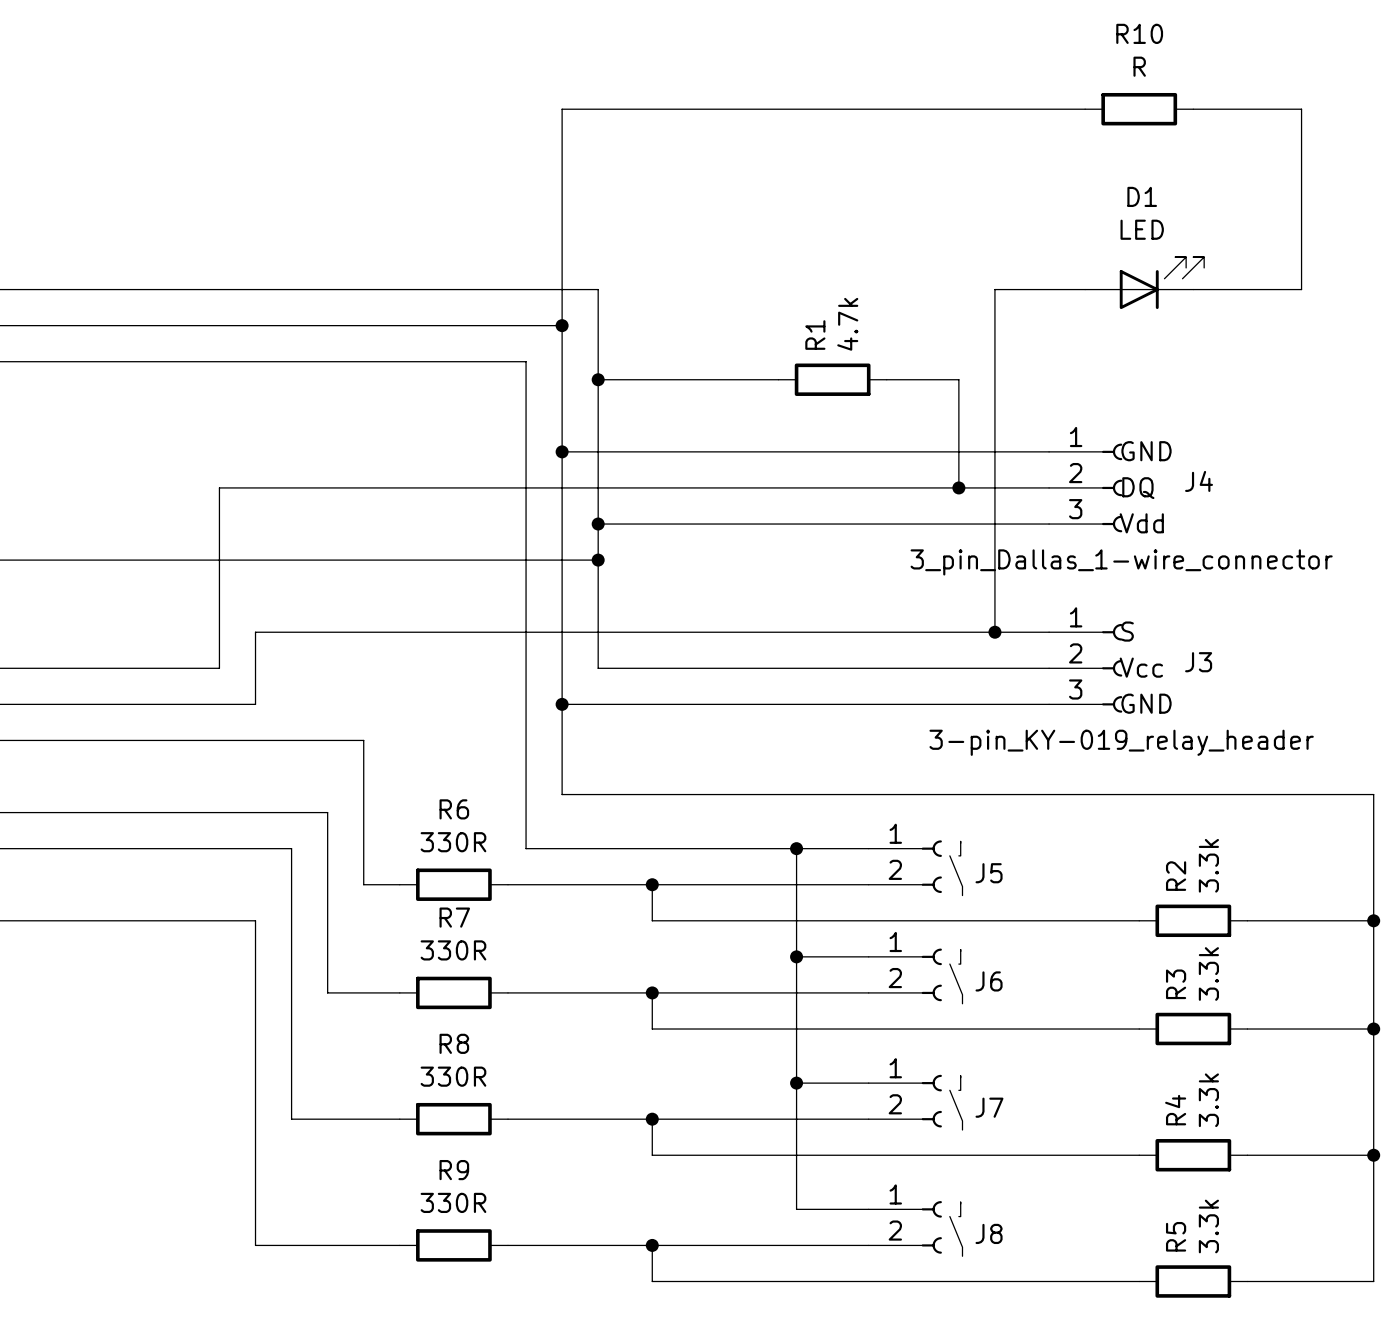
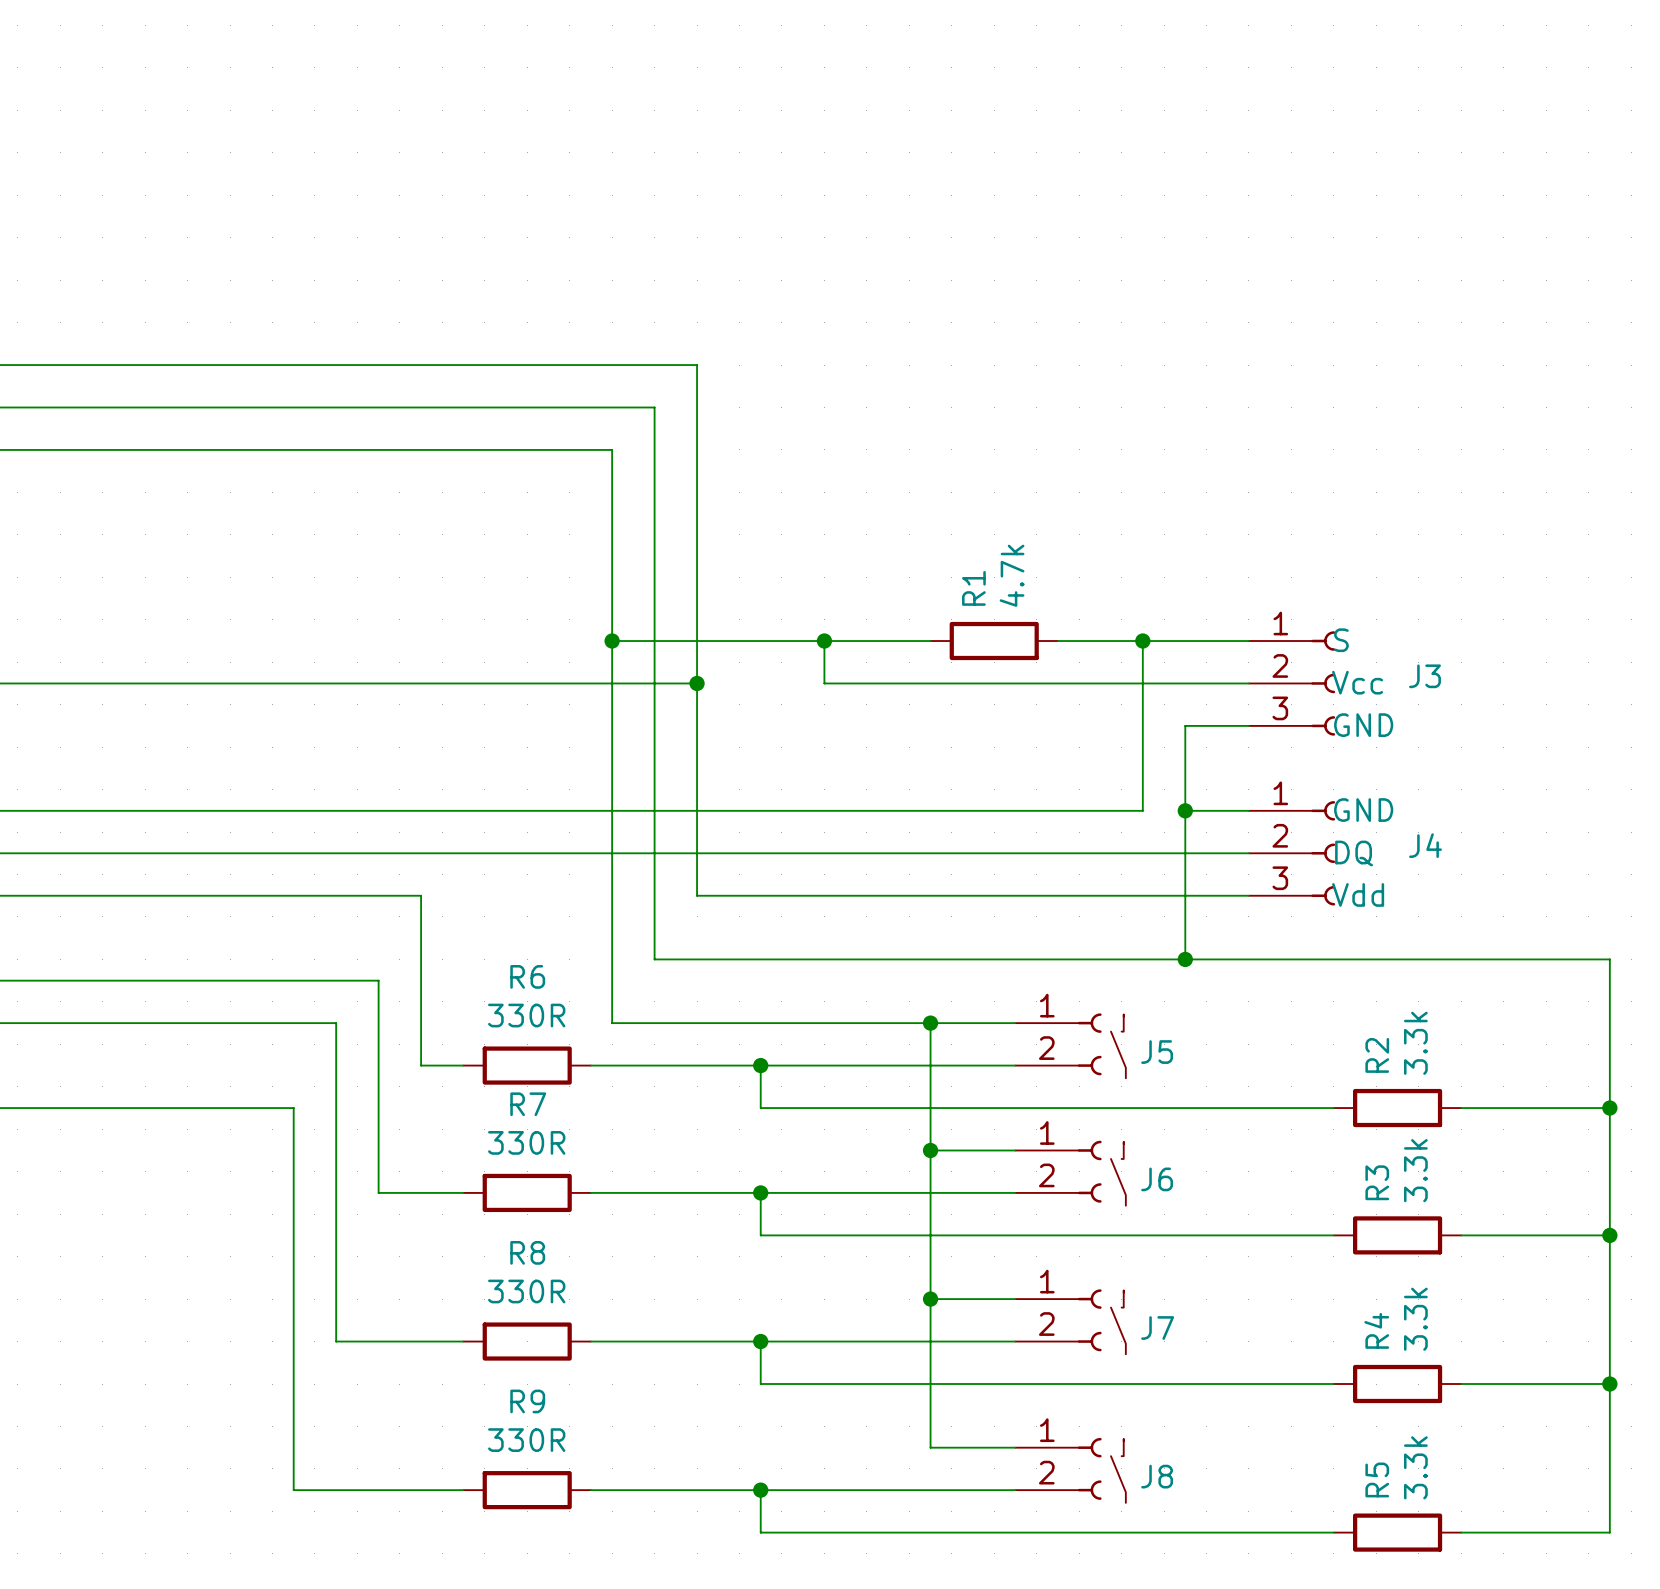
wire: (1085, 109) (562, 109) (562, 325) -> none
R10: R (1139, 109) -> none
wire: (1193, 109) (1301, 109) (1301, 289) (1193, 289) -> none
D1: LED (1144, 283) -> none
wire: (1085, 289) (994, 289) (994, 632) -> none
junction: (562, 325) -> none
wire: (598, 379) (778, 379) -> none
junction: (598, 379) -> none
R1 position: (832, 379) -> (994, 641)
wire: (886, 379) (958, 379) (958, 487) -> none
wire: (562, 451) (1049, 451) -> none
junction: (562, 451) -> none
junction position: (958, 487) -> (1142, 641)
wire: (1049, 487) (219, 487) (219, 668) -> (1248, 895) (697, 895) (697, 810) (251, 810)
J4 position: (1085, 487) -> (1292, 853)
wire: none -> (612, 641) (697, 641)
junction: none -> (612, 641)
junction: (598, 524) -> none
wire: none -> (824, 641) (824, 683) (1248, 683)
junction: none -> (824, 641)
wire: (796, 524) (904, 524) -> none
J4 value: 3_pin_Dallas_1-wire_connector (1121, 562) -> none
wire: none -> (1248, 725) (1185, 725) (1185, 959)
junction position: (994, 632) -> (1185, 810)
wire: (1049, 632) (255, 632) (255, 704) -> (654, 853) (293, 853)
wire: (976, 668) (1012, 668) -> (1142, 810) (1142, 641)
J3 position: (1085, 668) -> (1292, 683)
junction: (562, 704) -> none
J3 value: 3-pin_KY-019_relay_header (1121, 742) -> none
junction: none -> (1185, 959)

